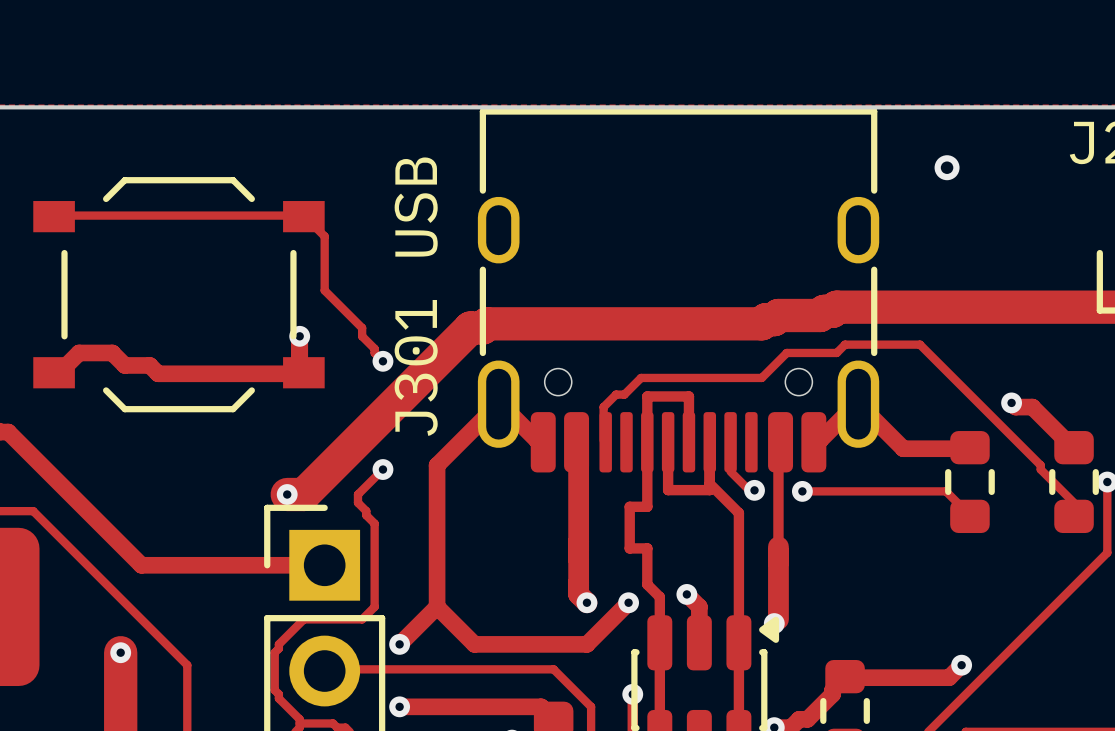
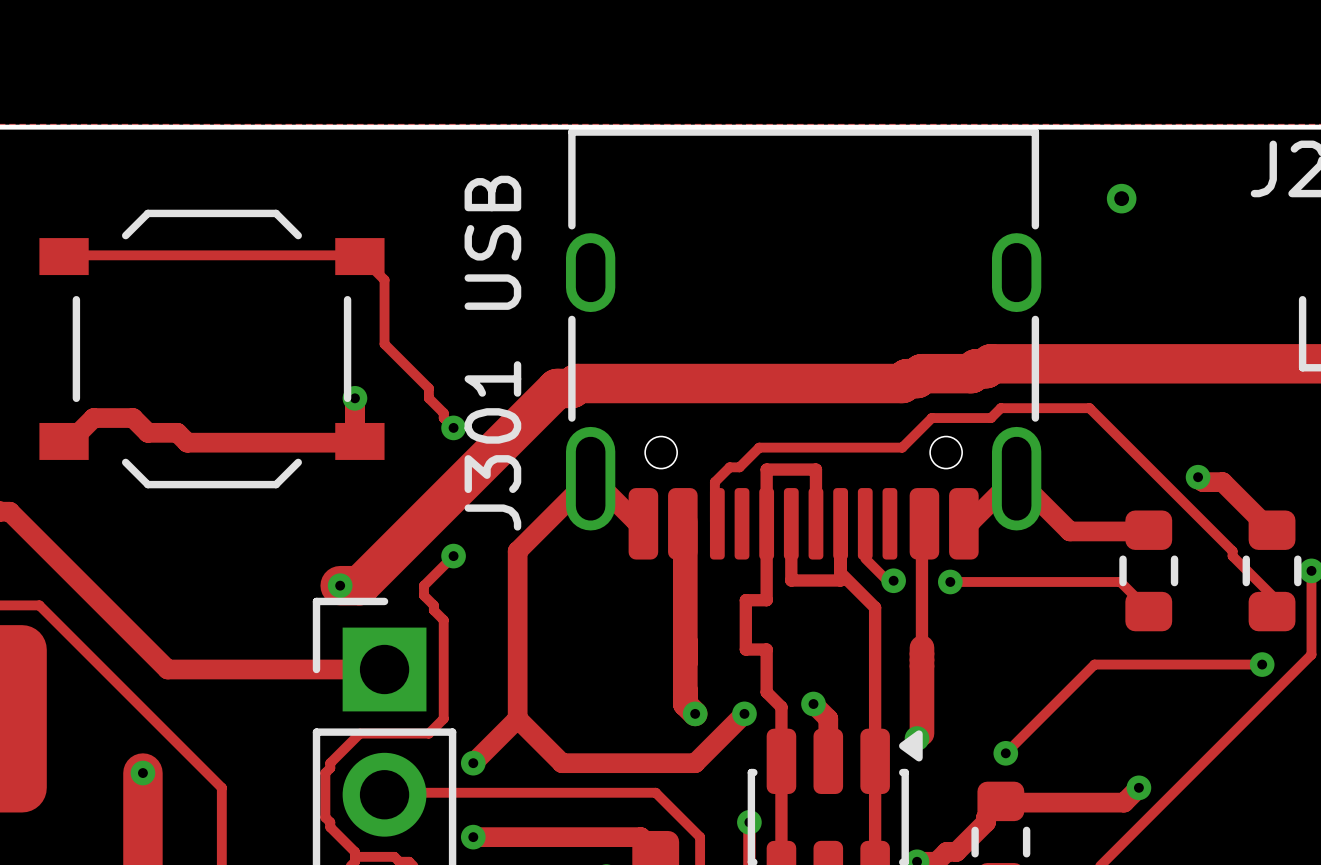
track: none -> (1262, 664) (1094, 664) (1005, 753)
via: none -> (1262, 664)
via: none -> (1005, 753)

